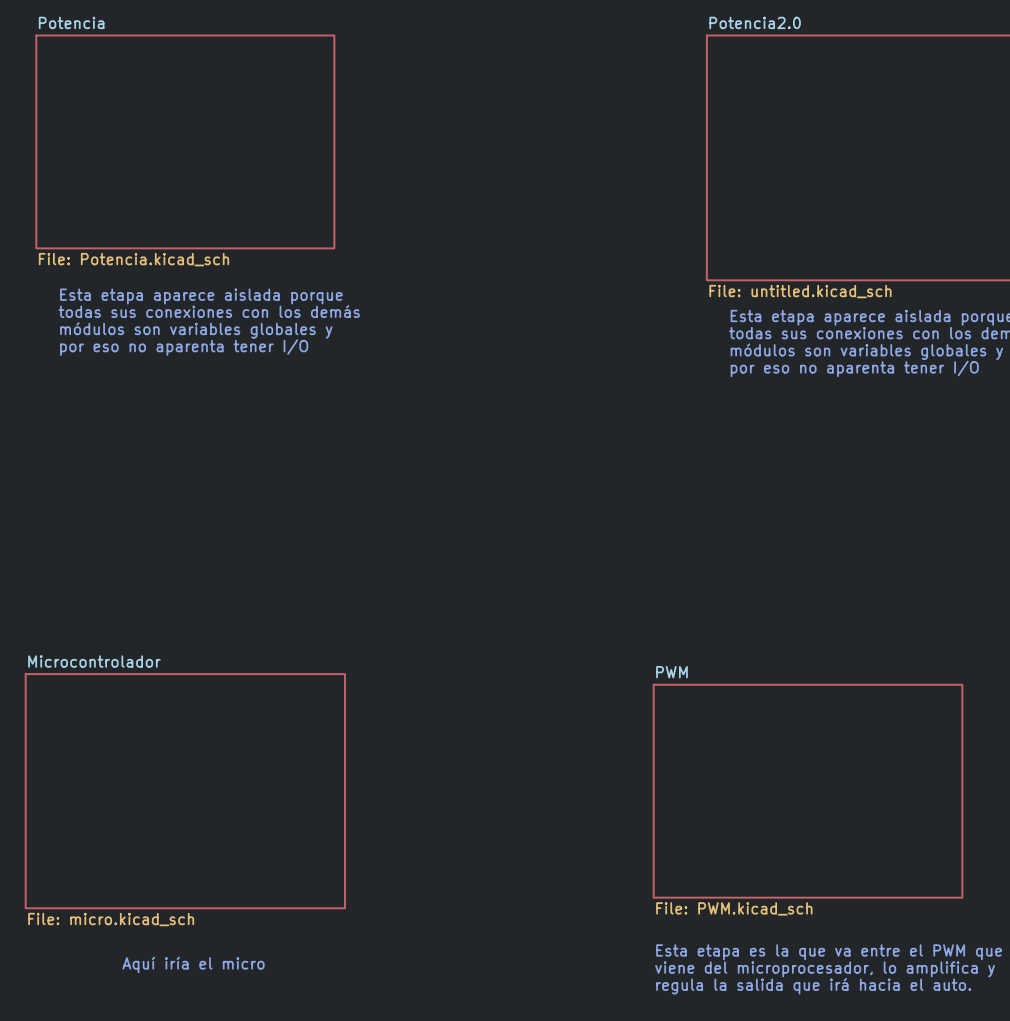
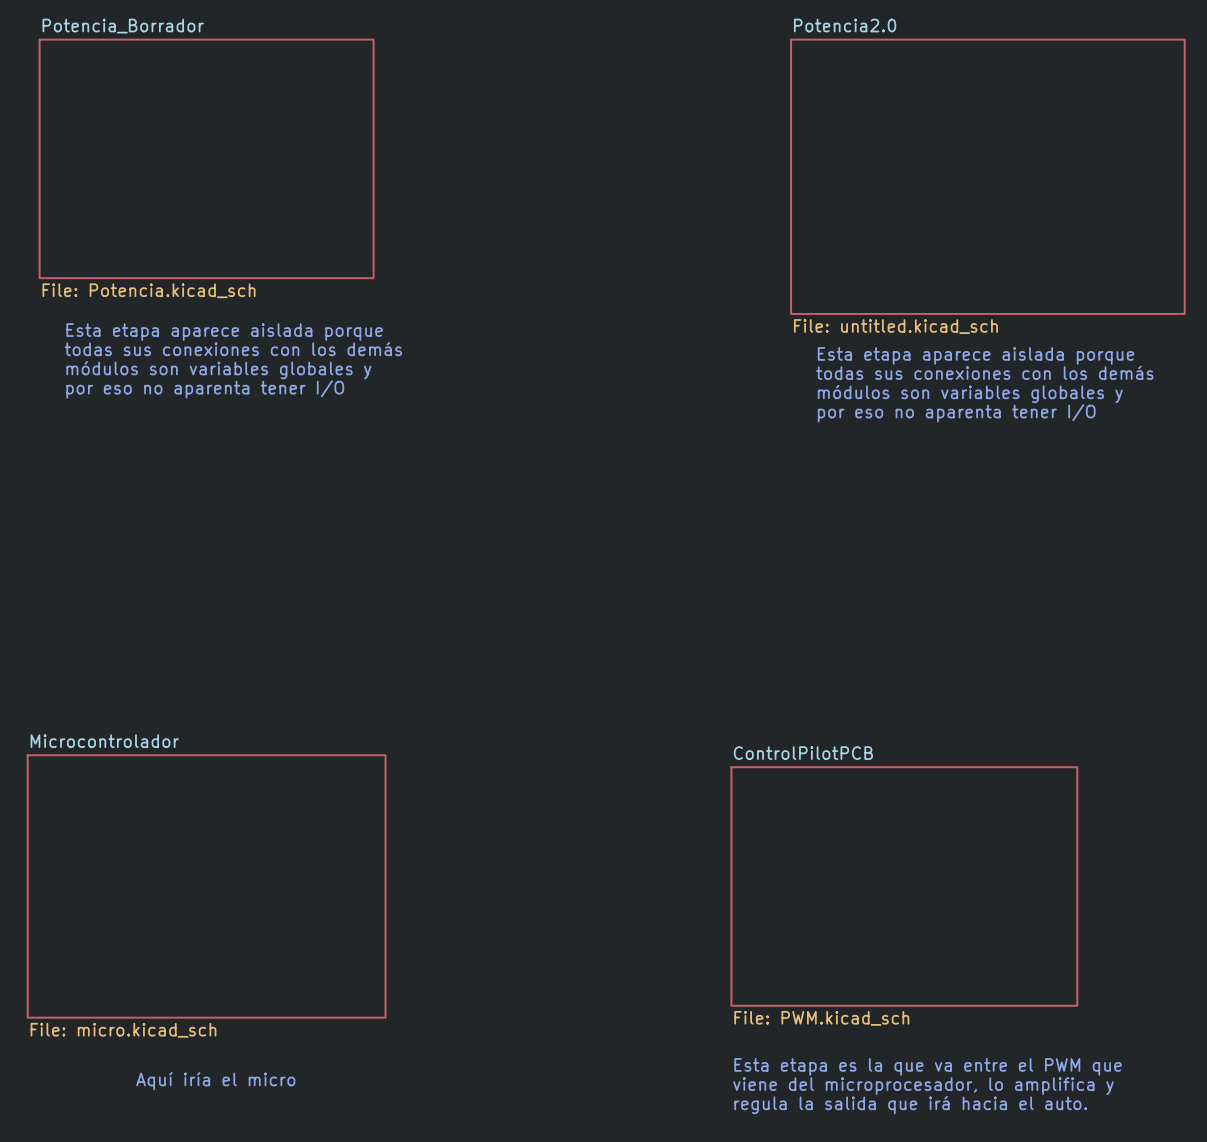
sheet Potencia name: Potencia (71, 22) -> Potencia_Borrador (123, 26)
sheet PWM name: PWM (672, 672) -> ControlPilotPCB (803, 753)

